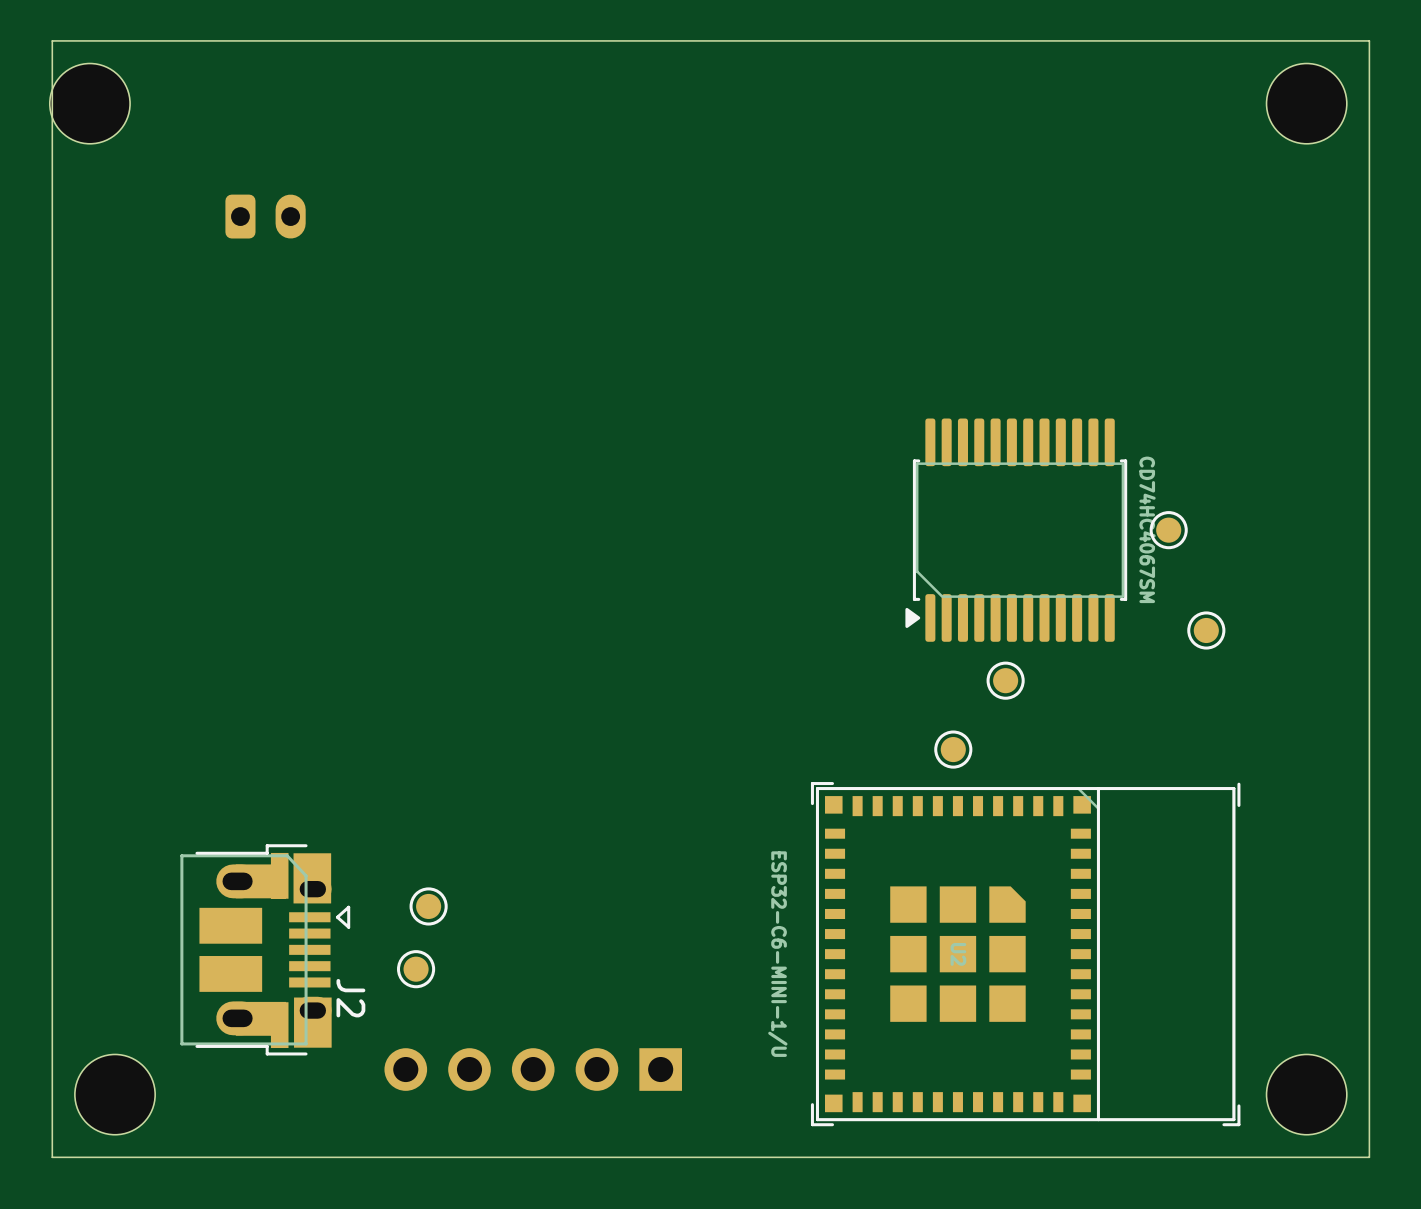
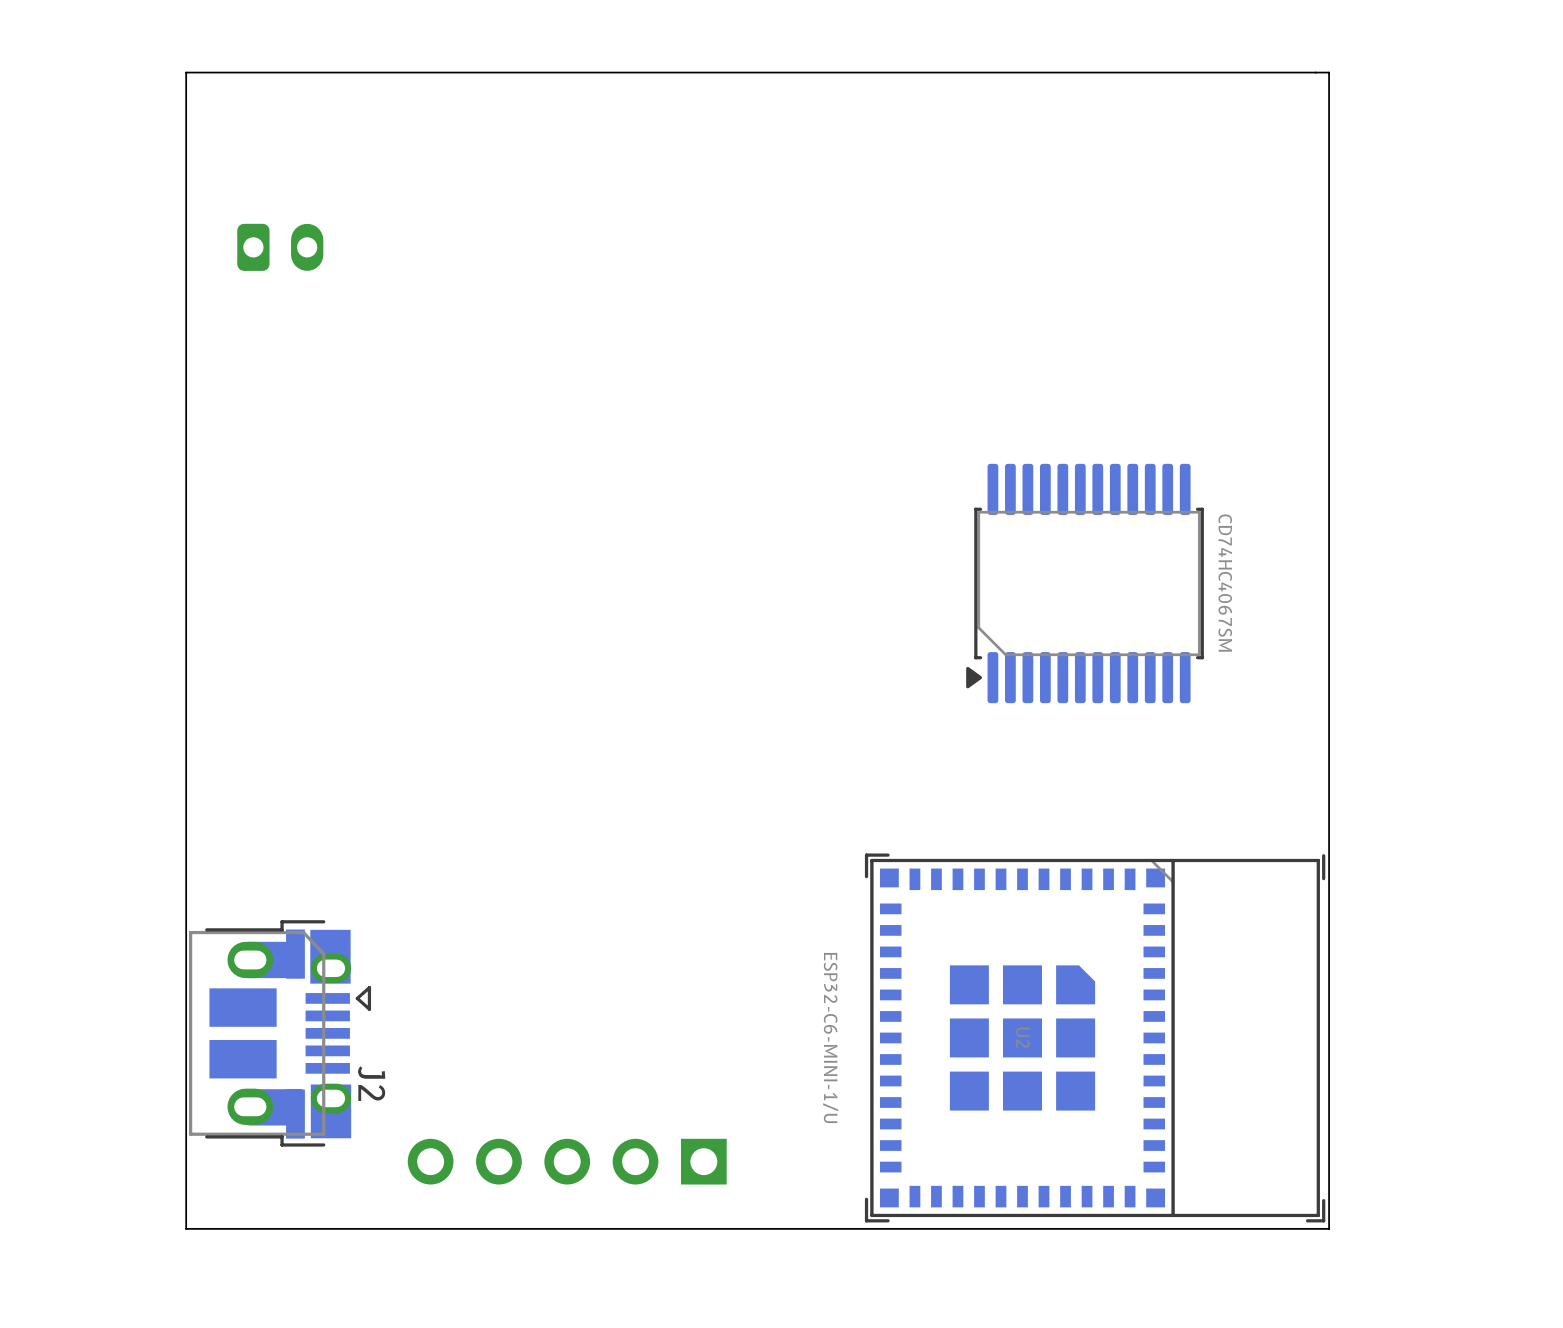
board edge: (1369, 40) (1369, 1157) (52, 1157) (52, 40) (1369, 40) -> (1329, 72) (1329, 1228) (186, 1228) (186, 72) (1329, 72)
part: (89, 103) -> none
part: (1306, 103) -> none
part: (1168, 530) -> none
part: (1206, 630) -> none
part: (1005, 680) -> none
part: (953, 749) -> none
part: (428, 906) -> none
part: (416, 969) -> none
part: (115, 1094) -> none
part: (1306, 1094) -> none

